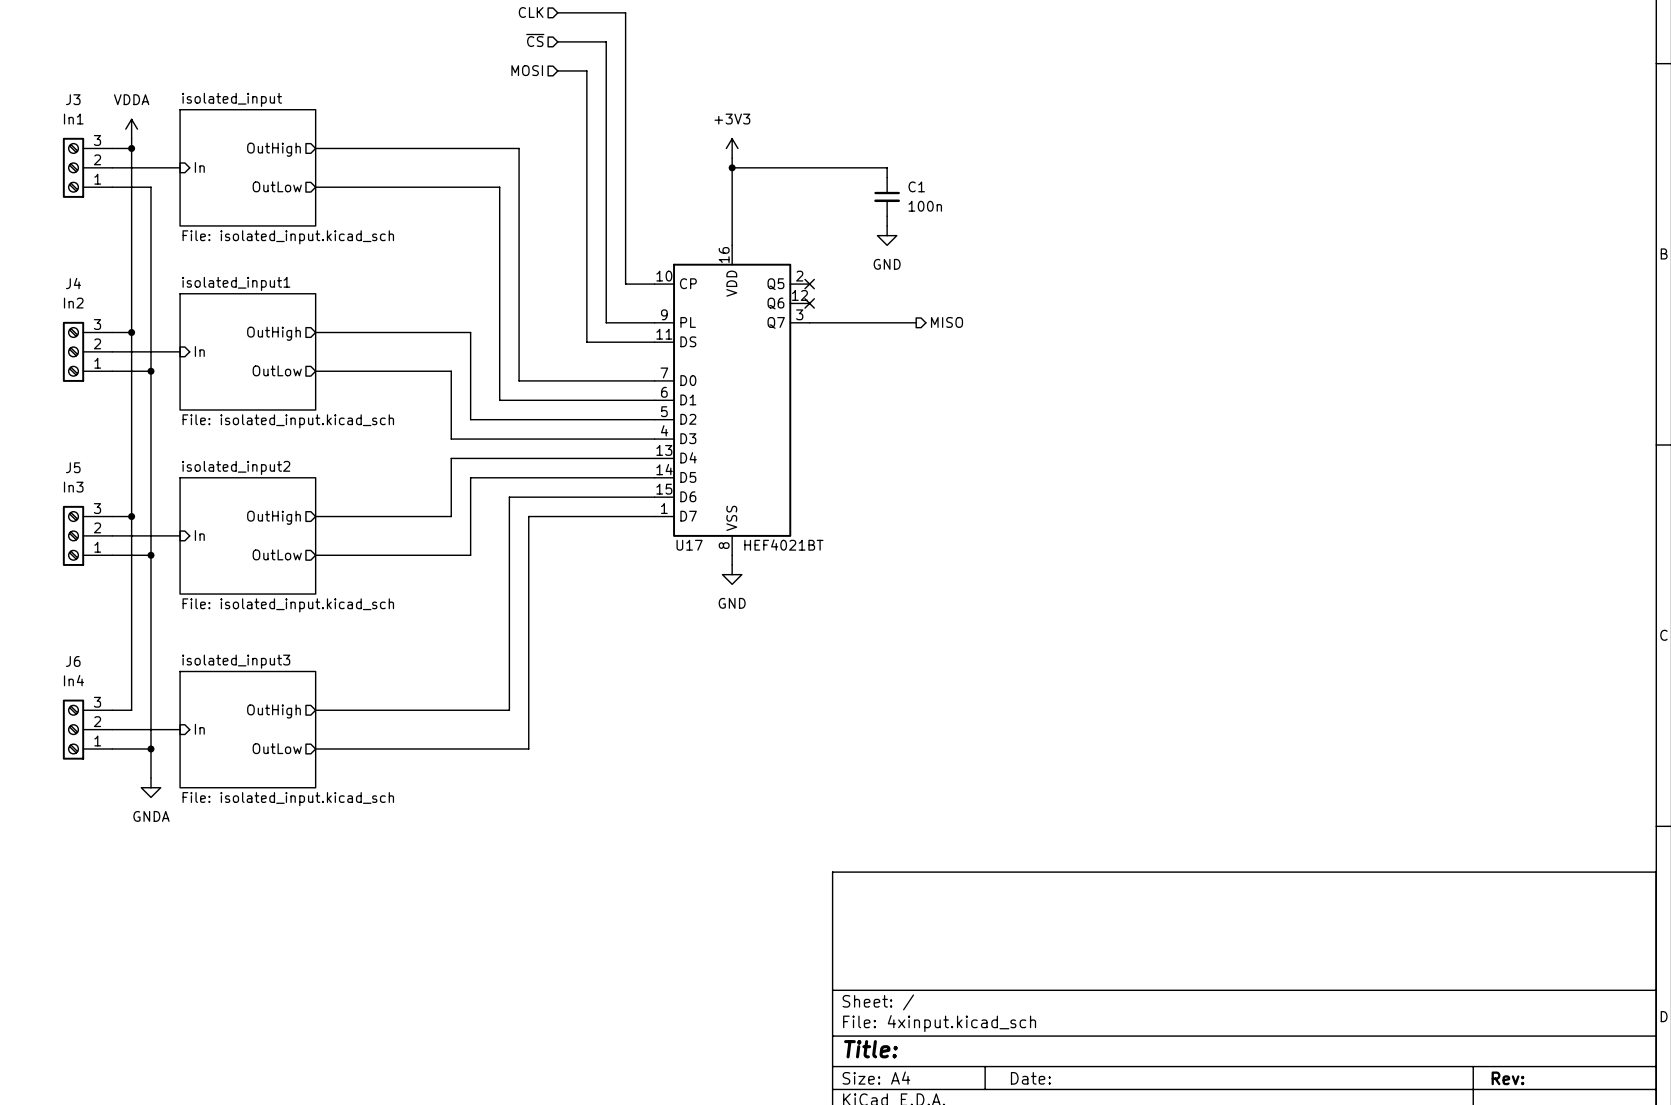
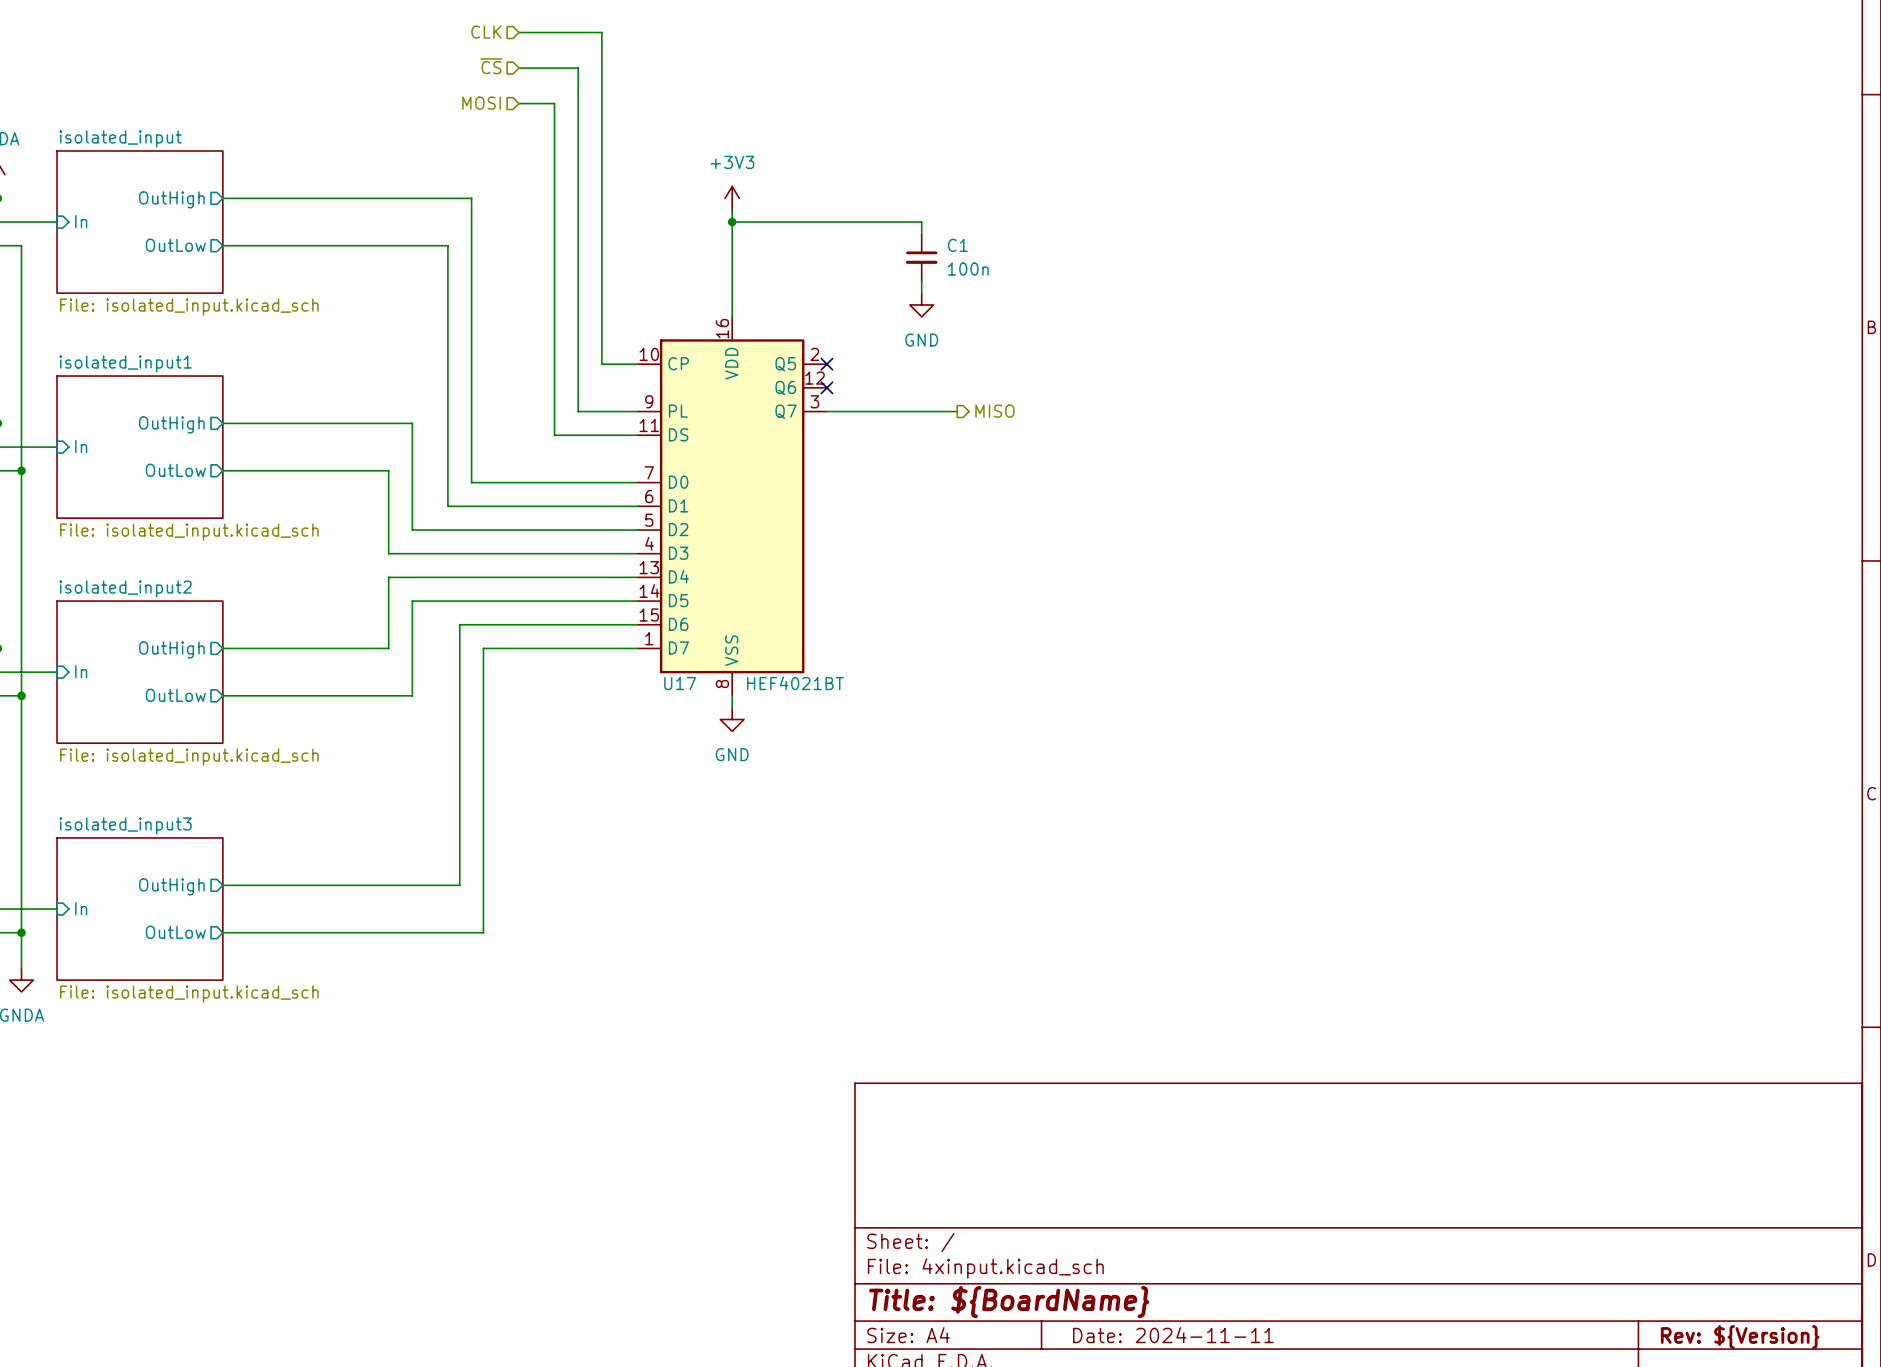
title block: Title: (870, 1049) -> Title: ${BoardName} (1009, 1302)
title block: Date: (1030, 1078) -> Date: 2024-11-11 (1173, 1335)
title block: Rev: (1507, 1078) -> Rev: ${Version} (1740, 1337)

